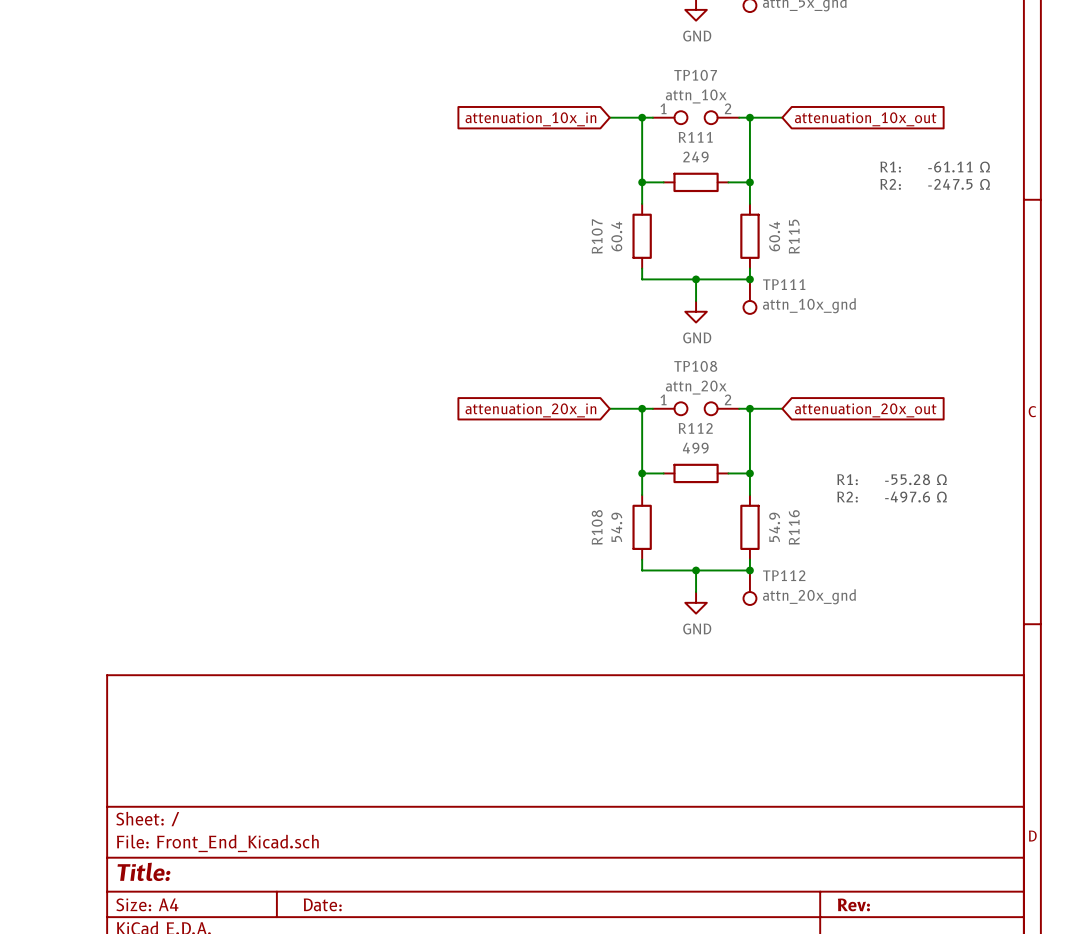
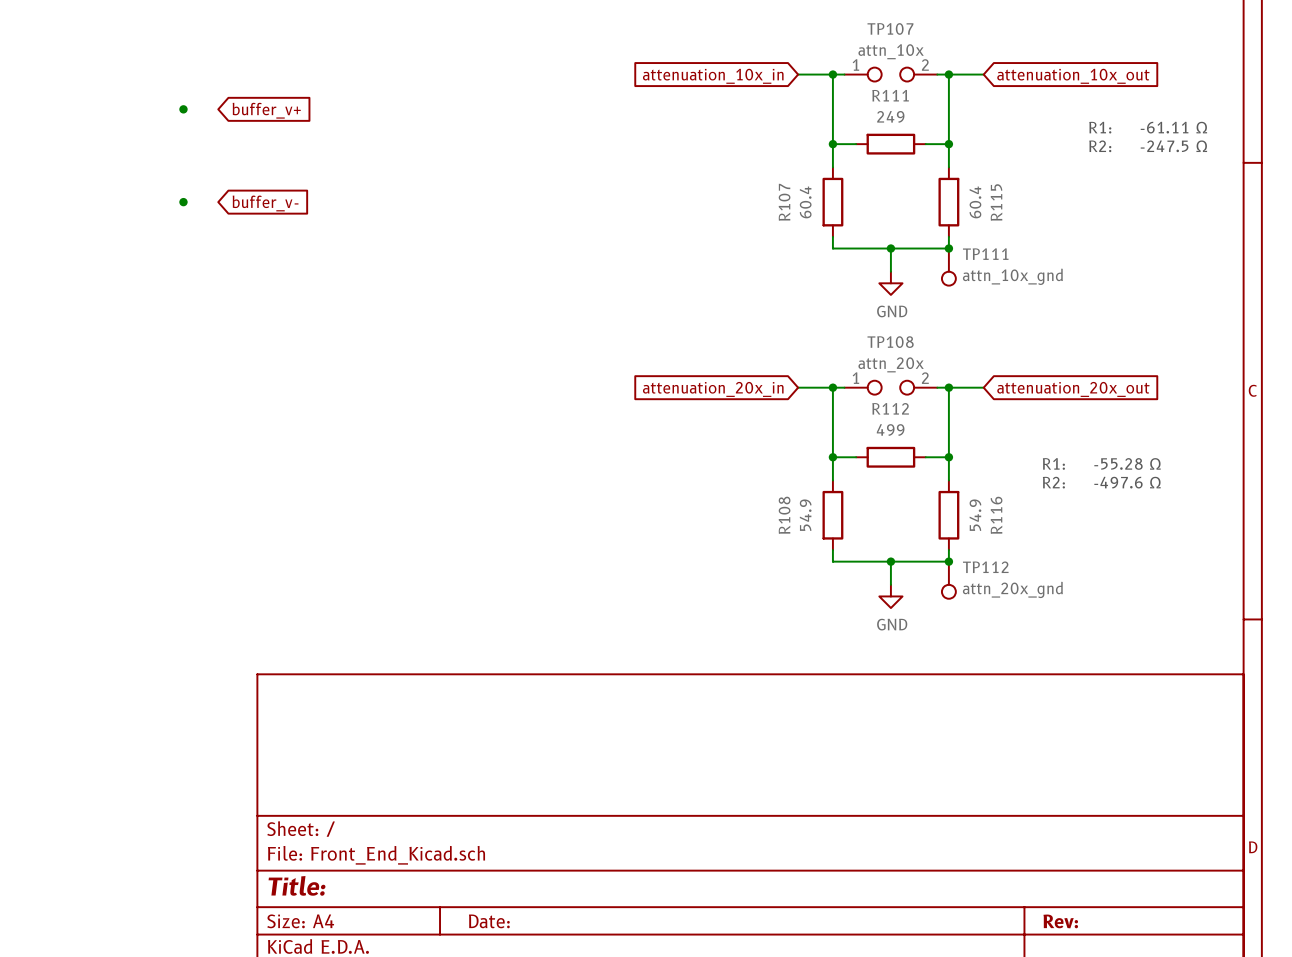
junction: none -> (183, 109)
global label: none -> buffer_v+ (266, 110)
junction: none -> (183, 202)
global label: none -> buffer_v- (265, 203)

